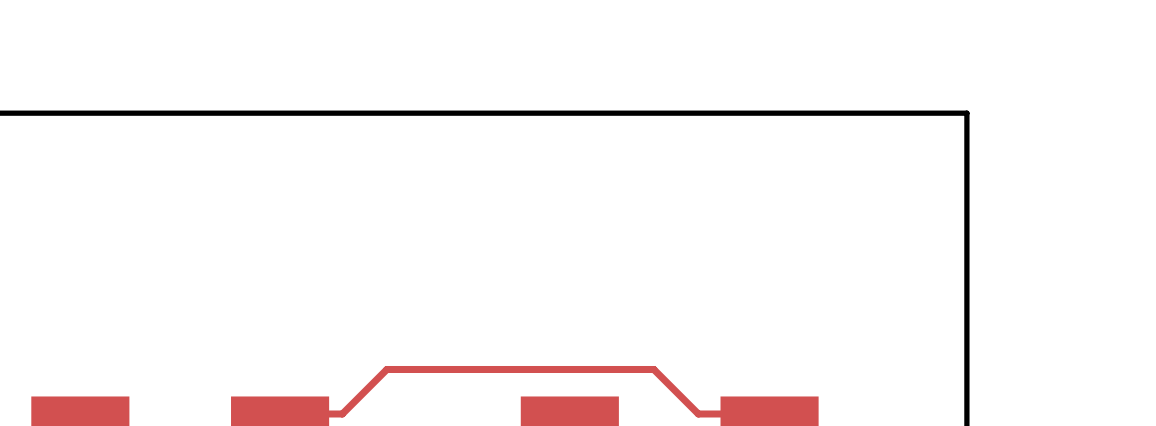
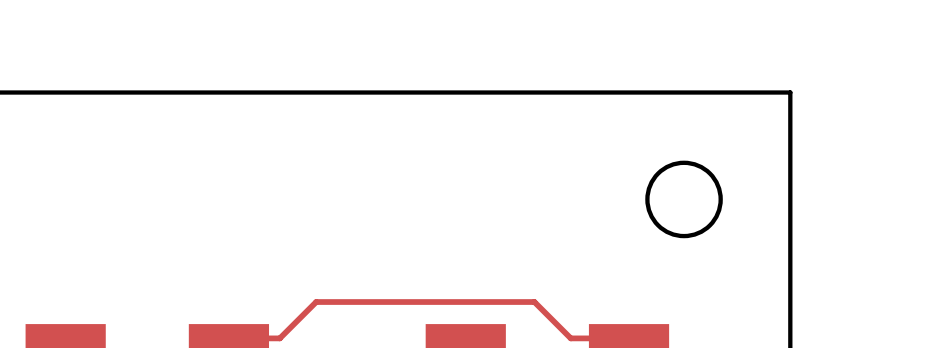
round board edge: none -> [645, 160, 723, 239]

